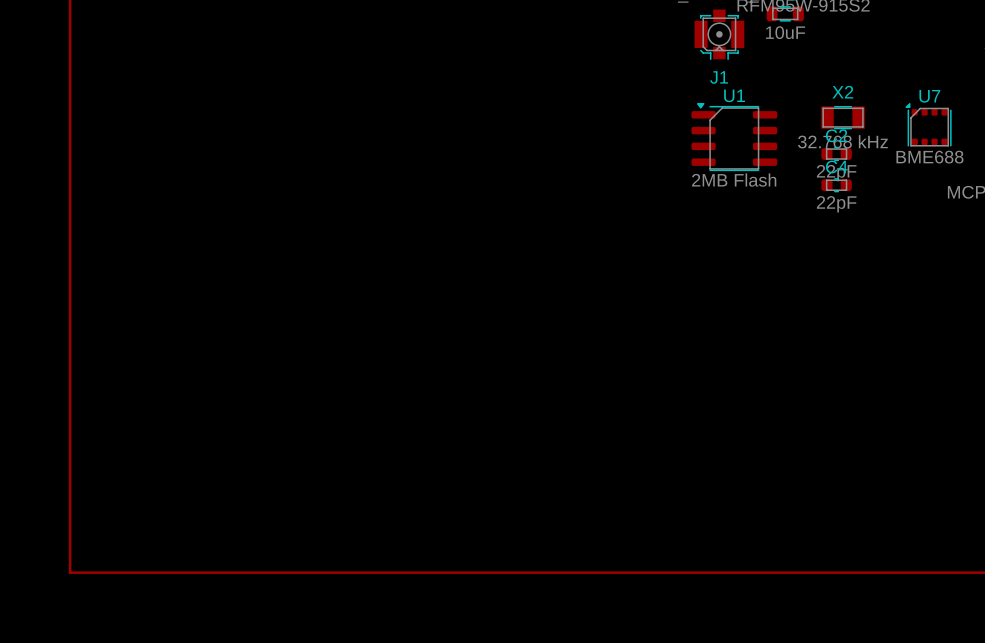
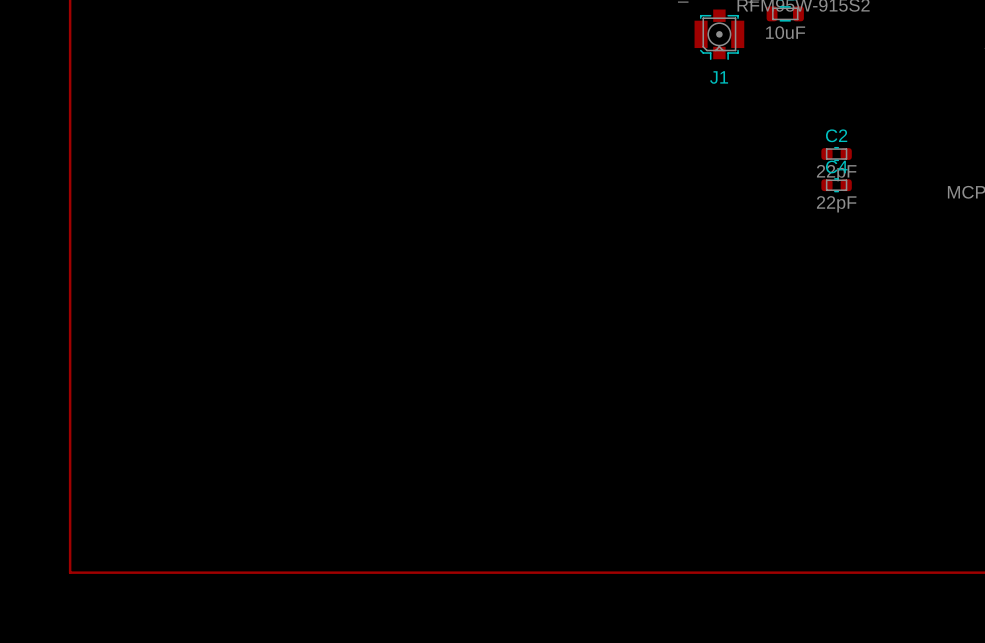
X2: 32.768 kHz (843, 117) -> none
U7: BME688 (928, 124) -> none
U1: 2MB Flash (734, 137) -> none

